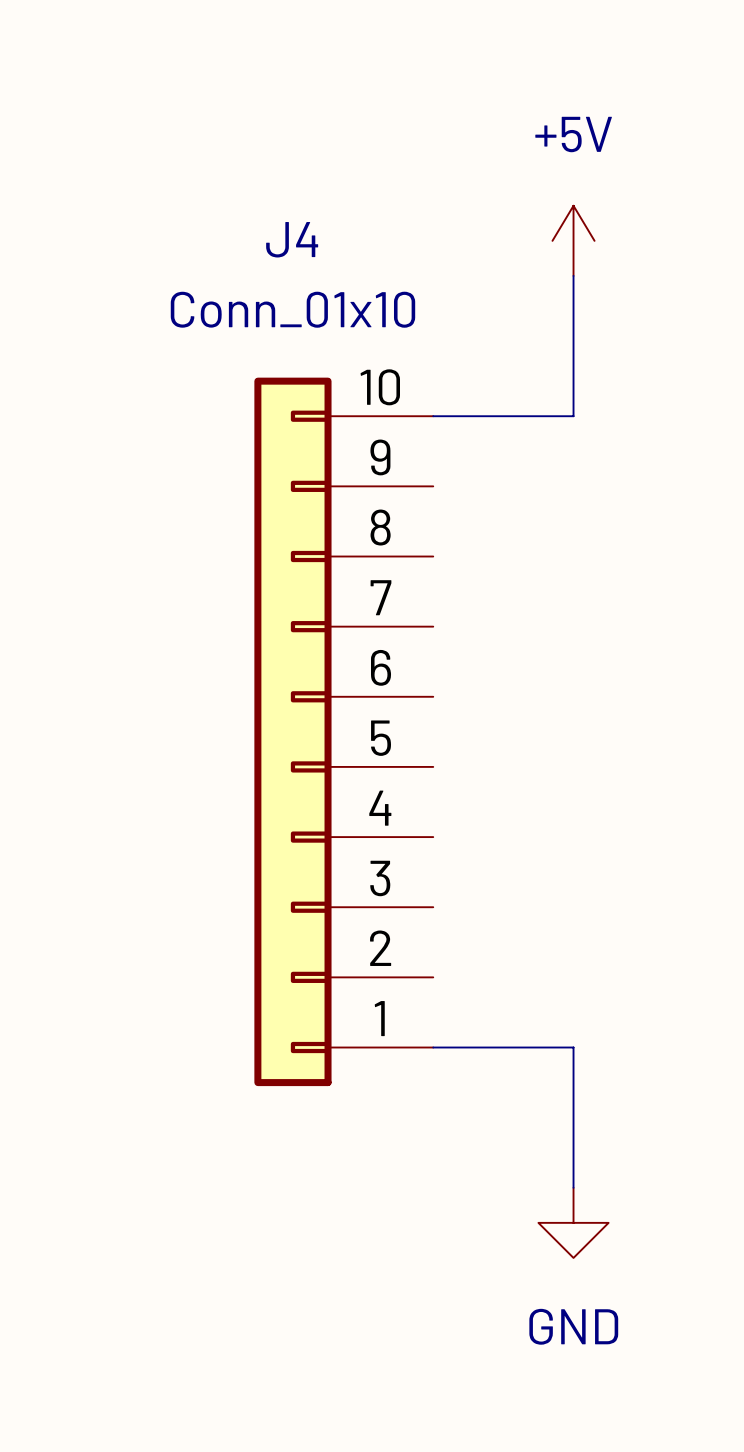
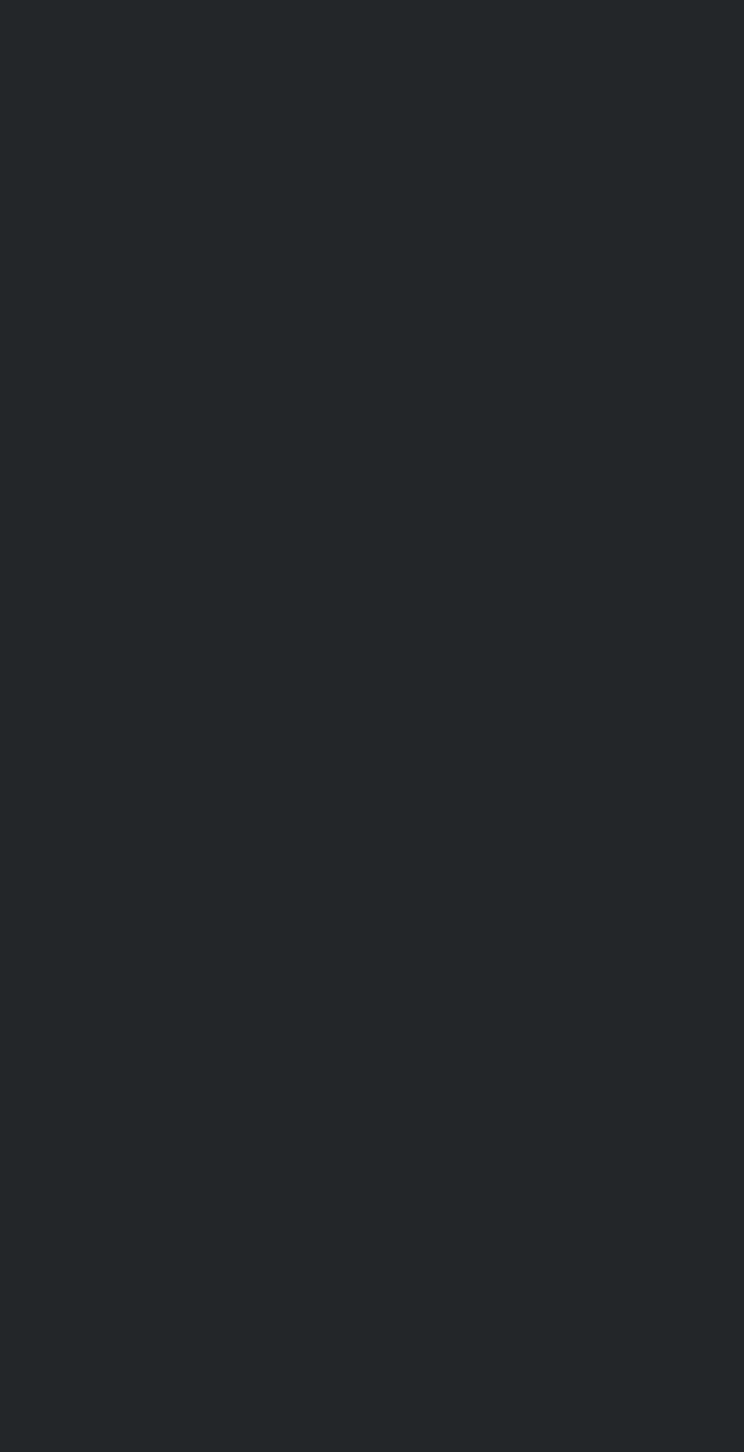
power symbol: +5V (573, 240) -> none
wire: (573, 275) (573, 416) (433, 416) -> none
J4: Conn_01x10 (343, 731) -> none
wire: (433, 1047) (573, 1047) (573, 1187) -> none
power symbol: GND (573, 1222) -> none

